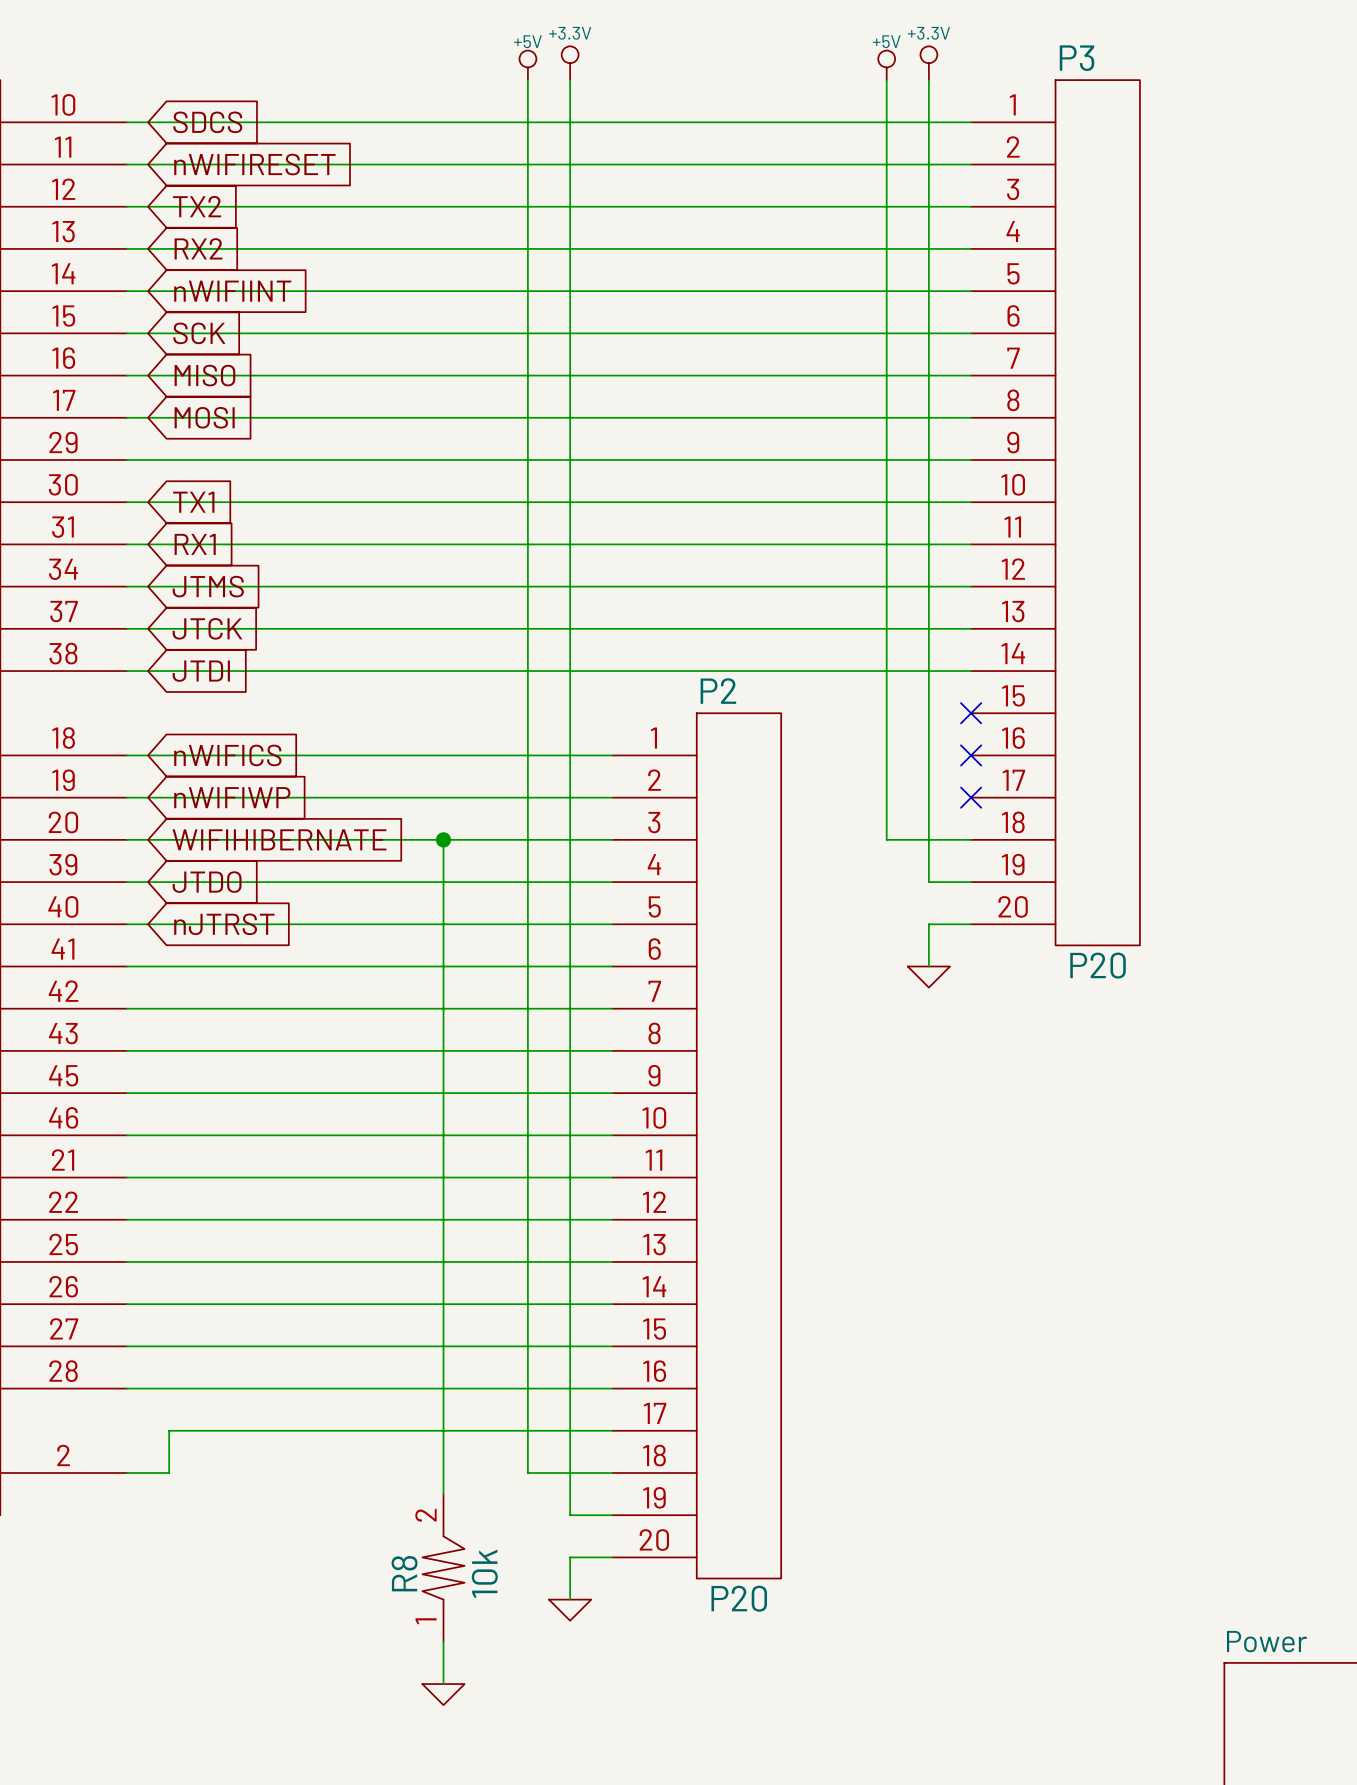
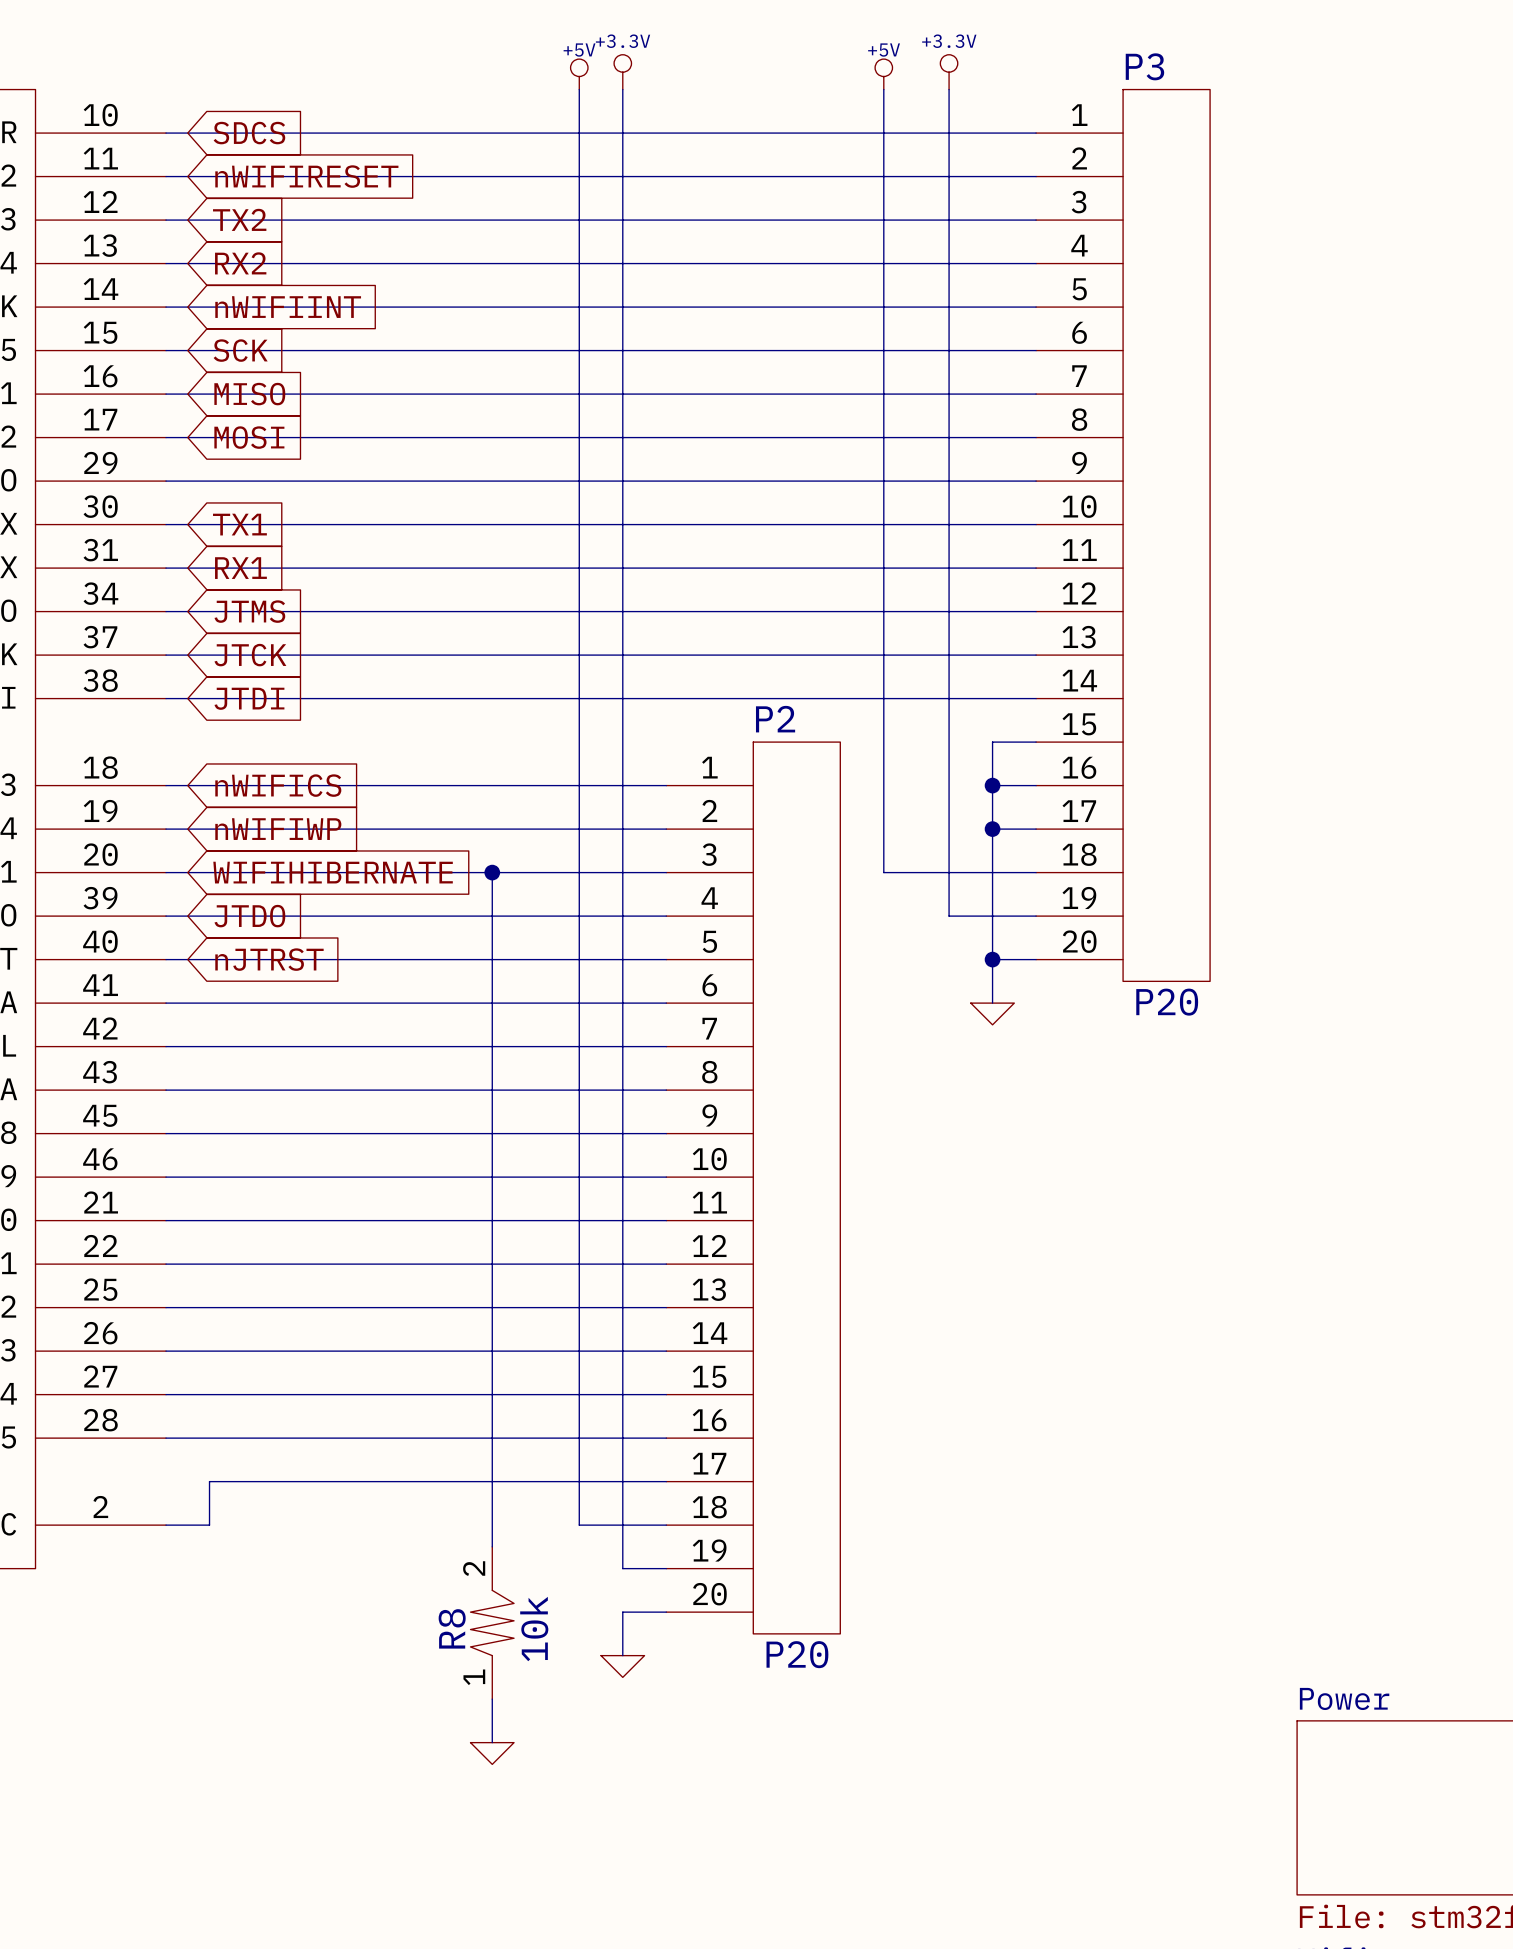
power symbol: +3.3V (928, 63) -> none
power symbol: none -> +5V (883, 74)
power symbol: +5V (886, 65) -> +3.3V (949, 72)
wire: none -> (883, 89) (883, 872) (949, 872) (949, 916) (992, 916) (992, 959)
wire: (928, 80) (928, 713) -> (1036, 742) (992, 742)
no-connect mark: (971, 713) -> none
wire: none -> (992, 785) (1036, 785)
junction: none -> (992, 785)
no-connect mark: (971, 755) -> none
wire: none -> (992, 829) (1036, 829)
junction: none -> (992, 829)
no-connect mark: (971, 797) -> none
junction: none -> (992, 959)

